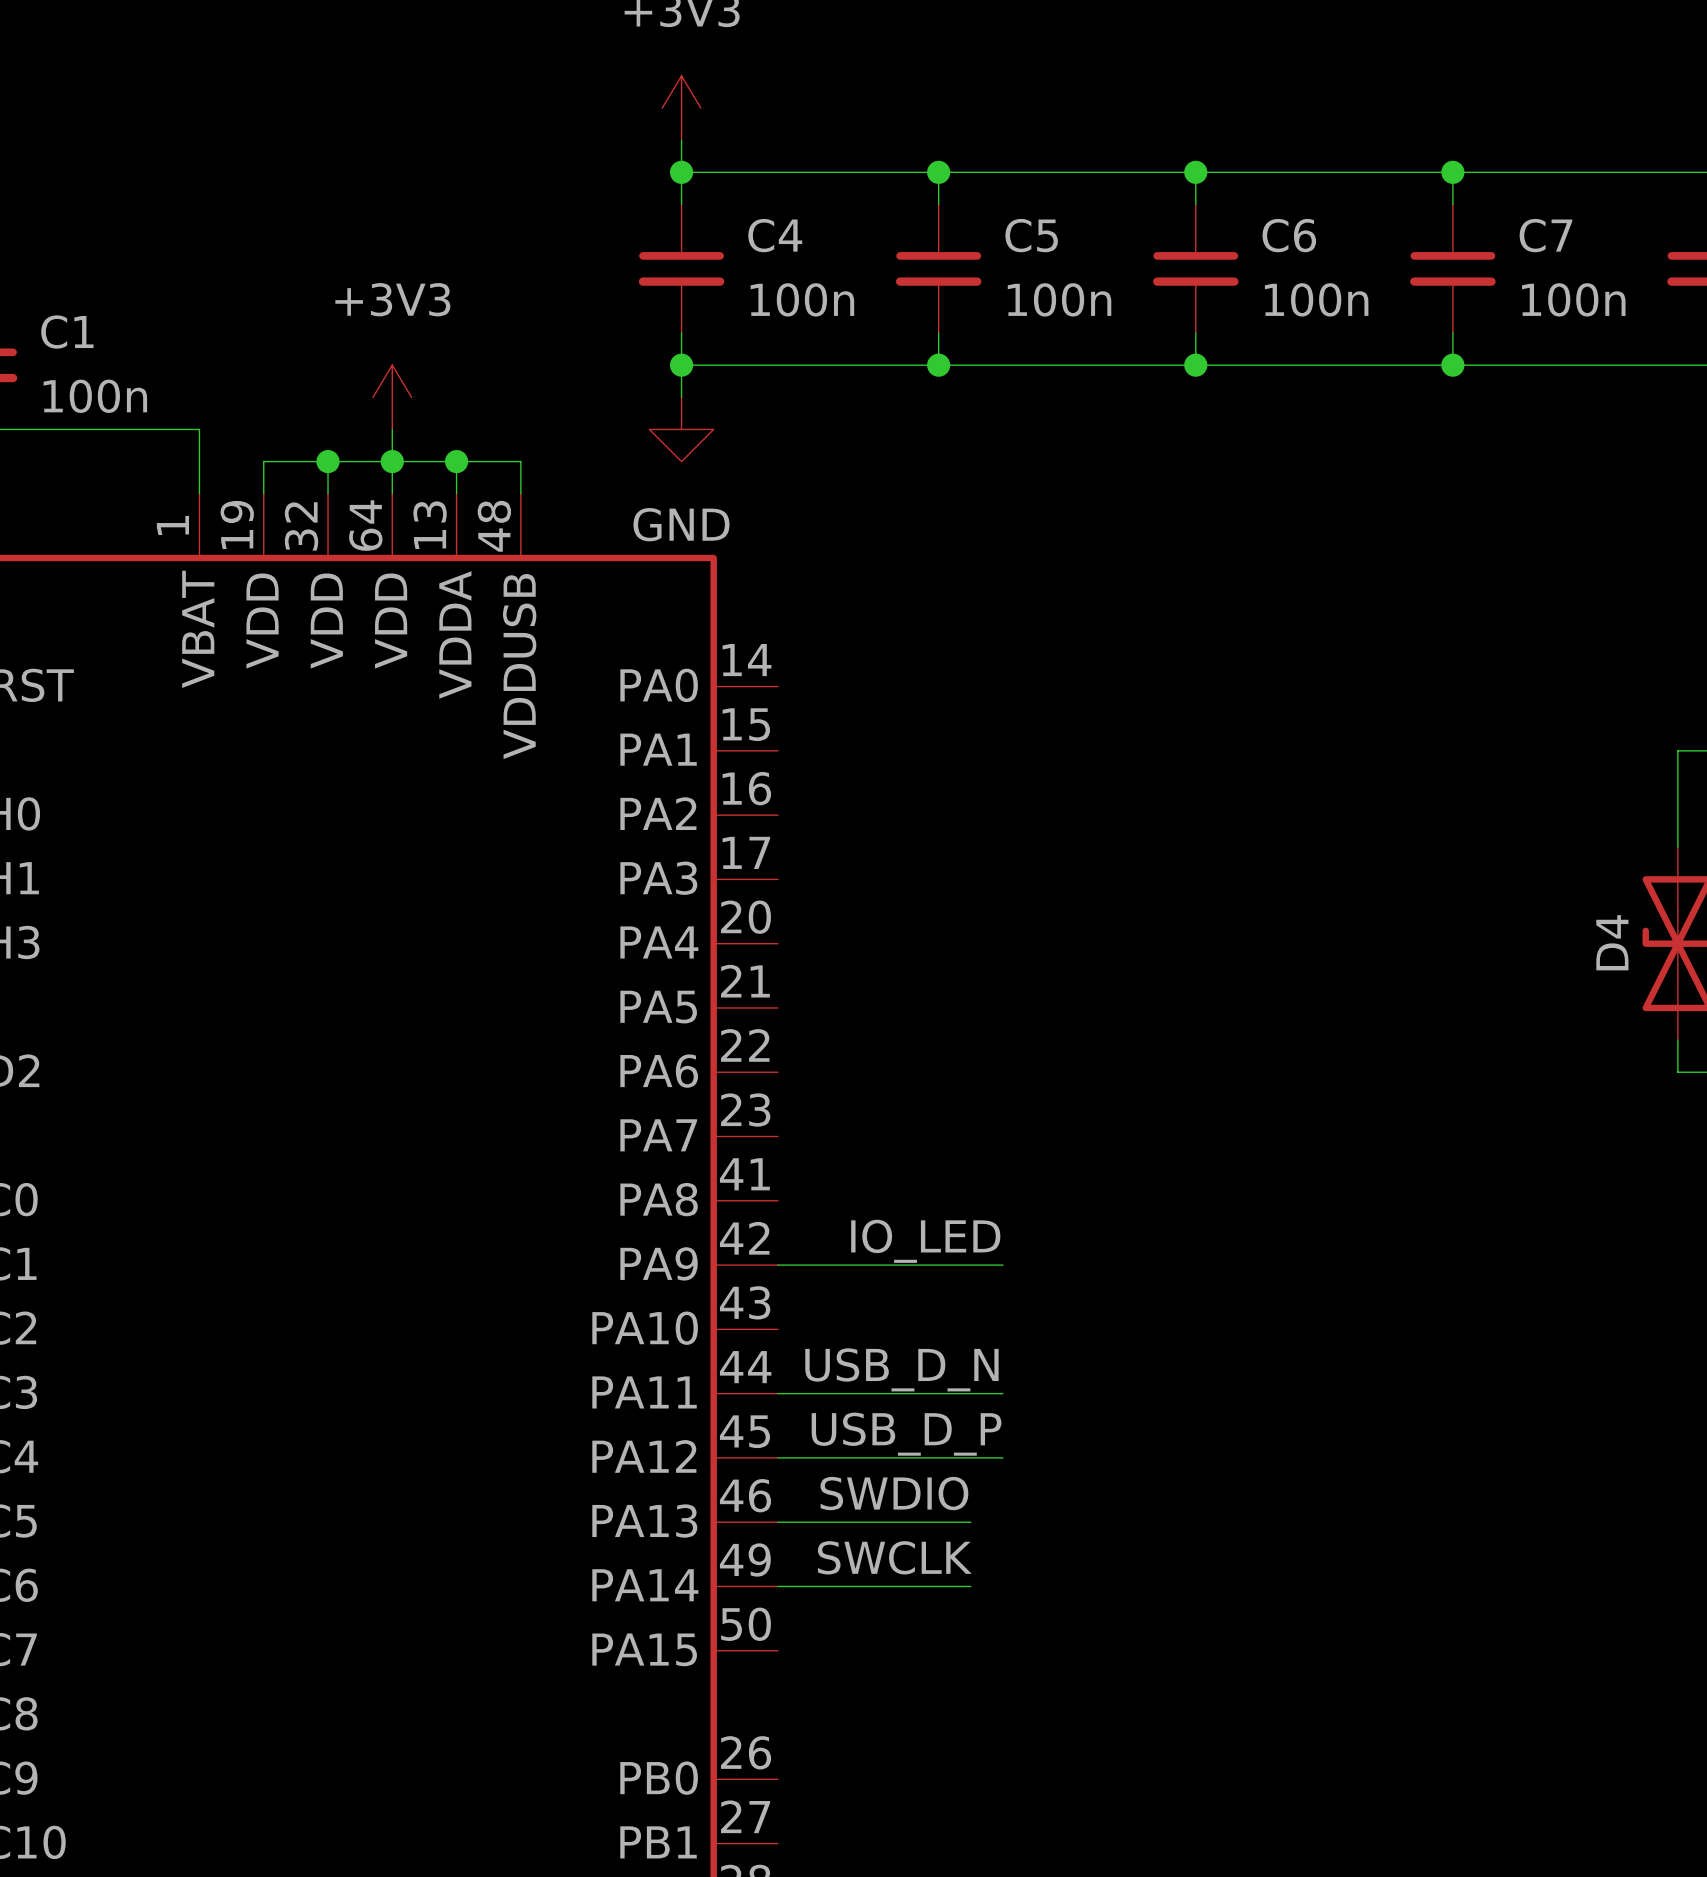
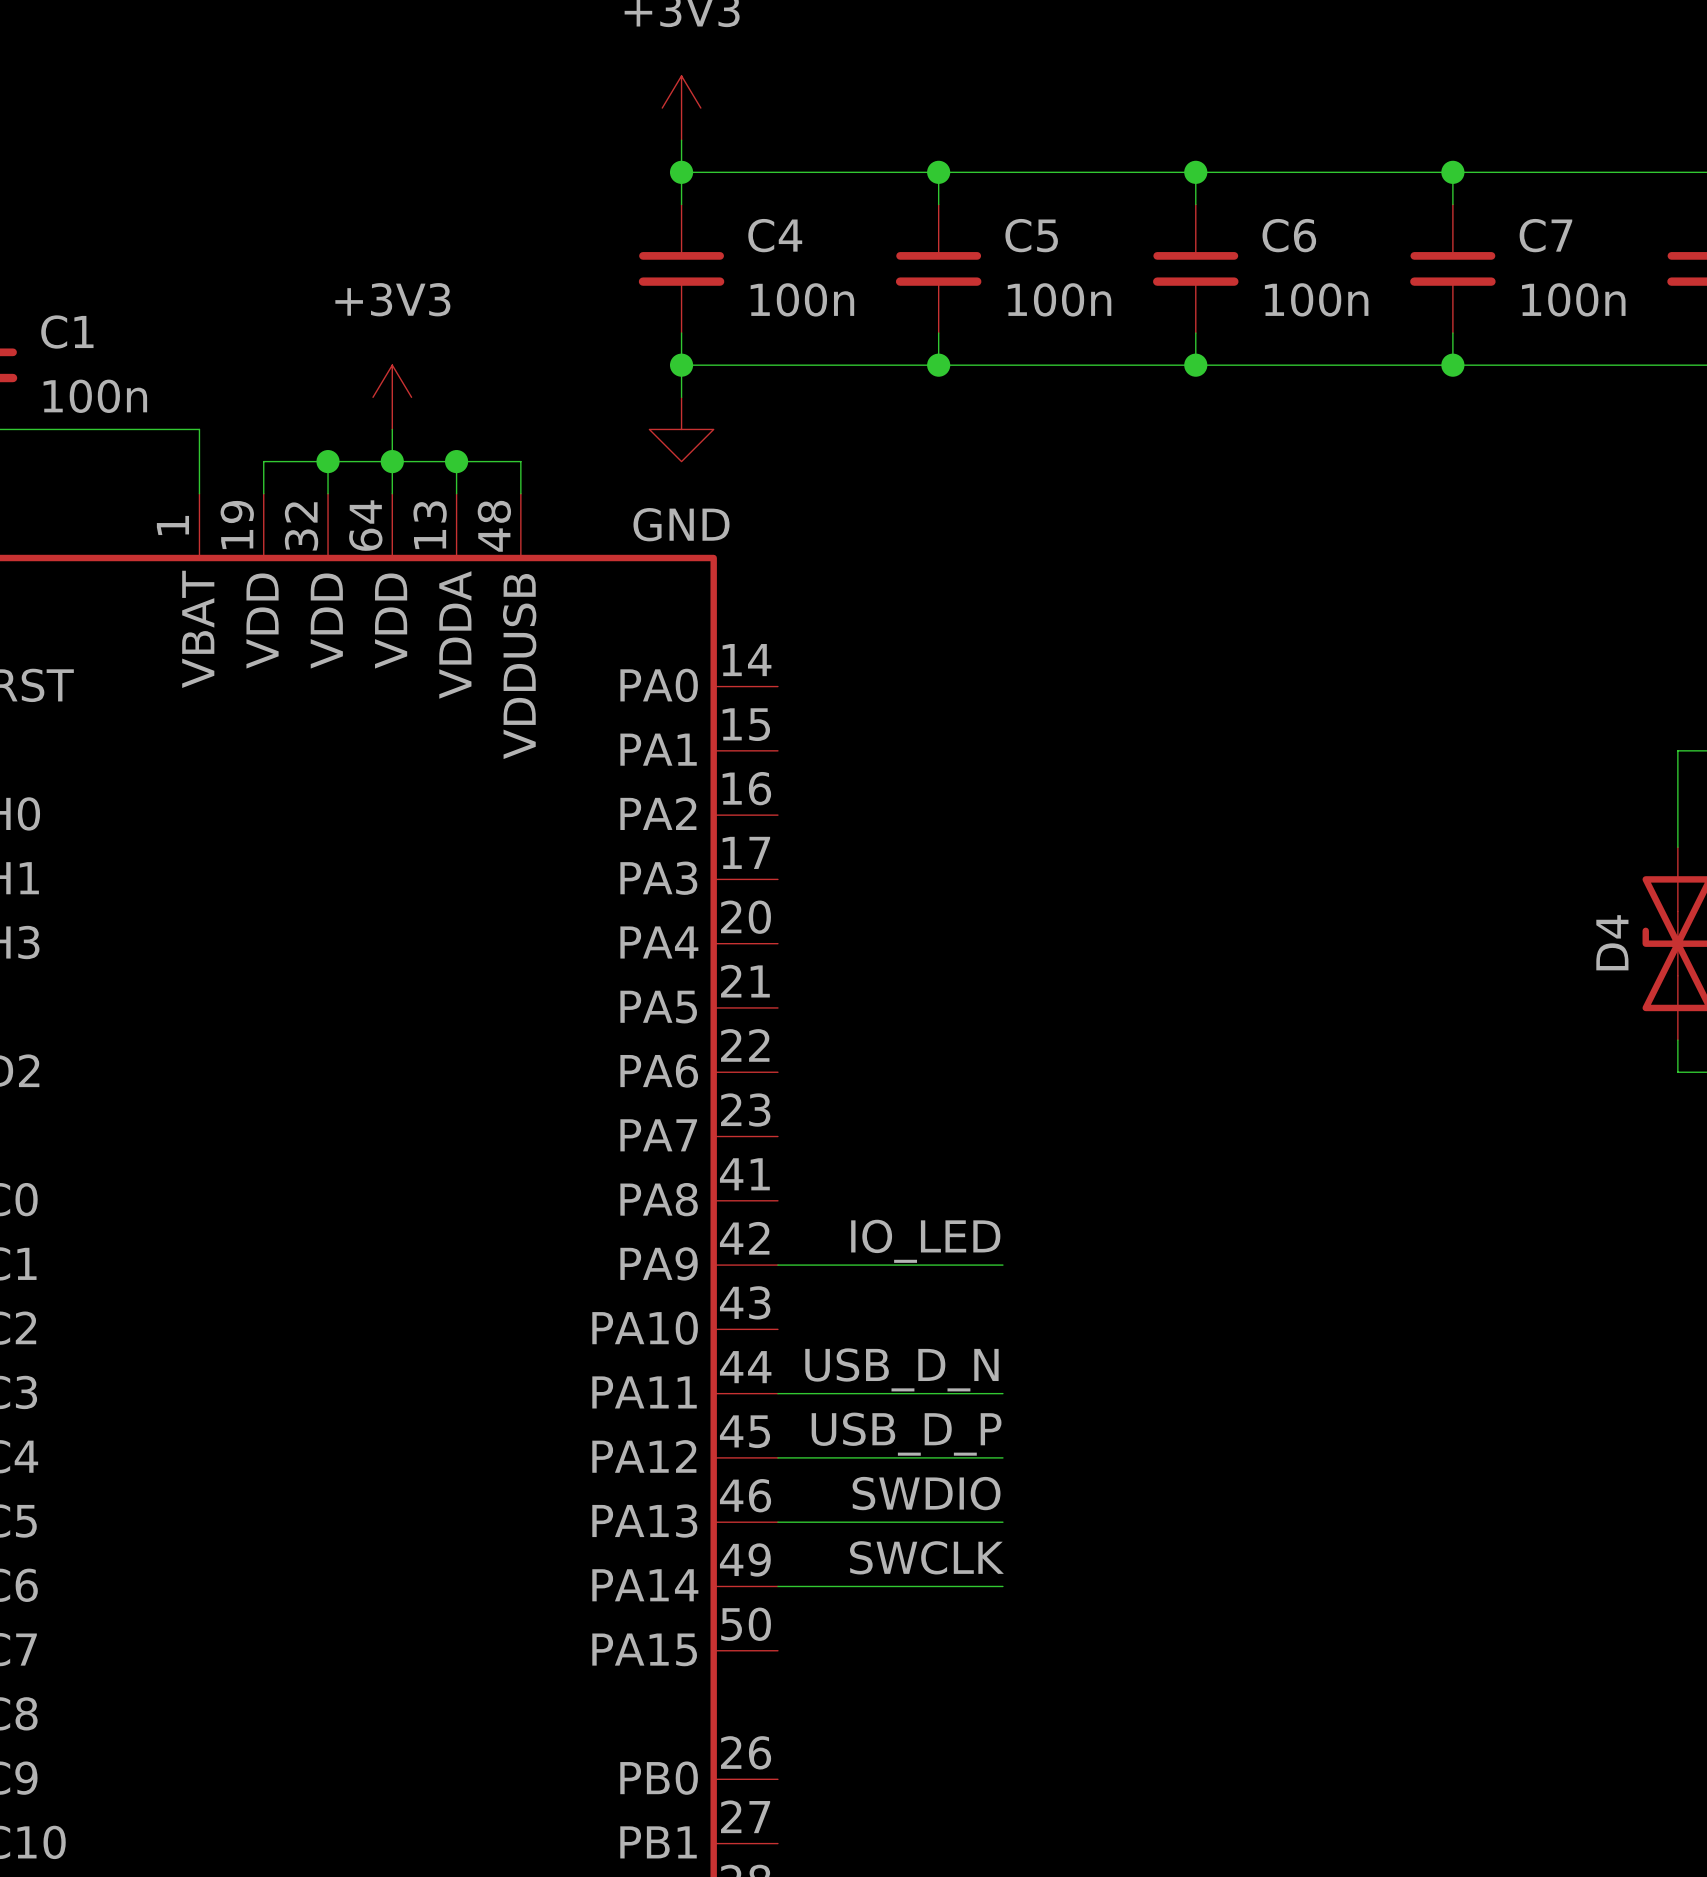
label position: SWDIO (894, 1493) -> SWDIO (926, 1493)
wire: none -> (970, 1522) (1002, 1522)
label position: SWCLK (894, 1557) -> SWCLK (926, 1557)
wire: none -> (970, 1586) (1002, 1586)

